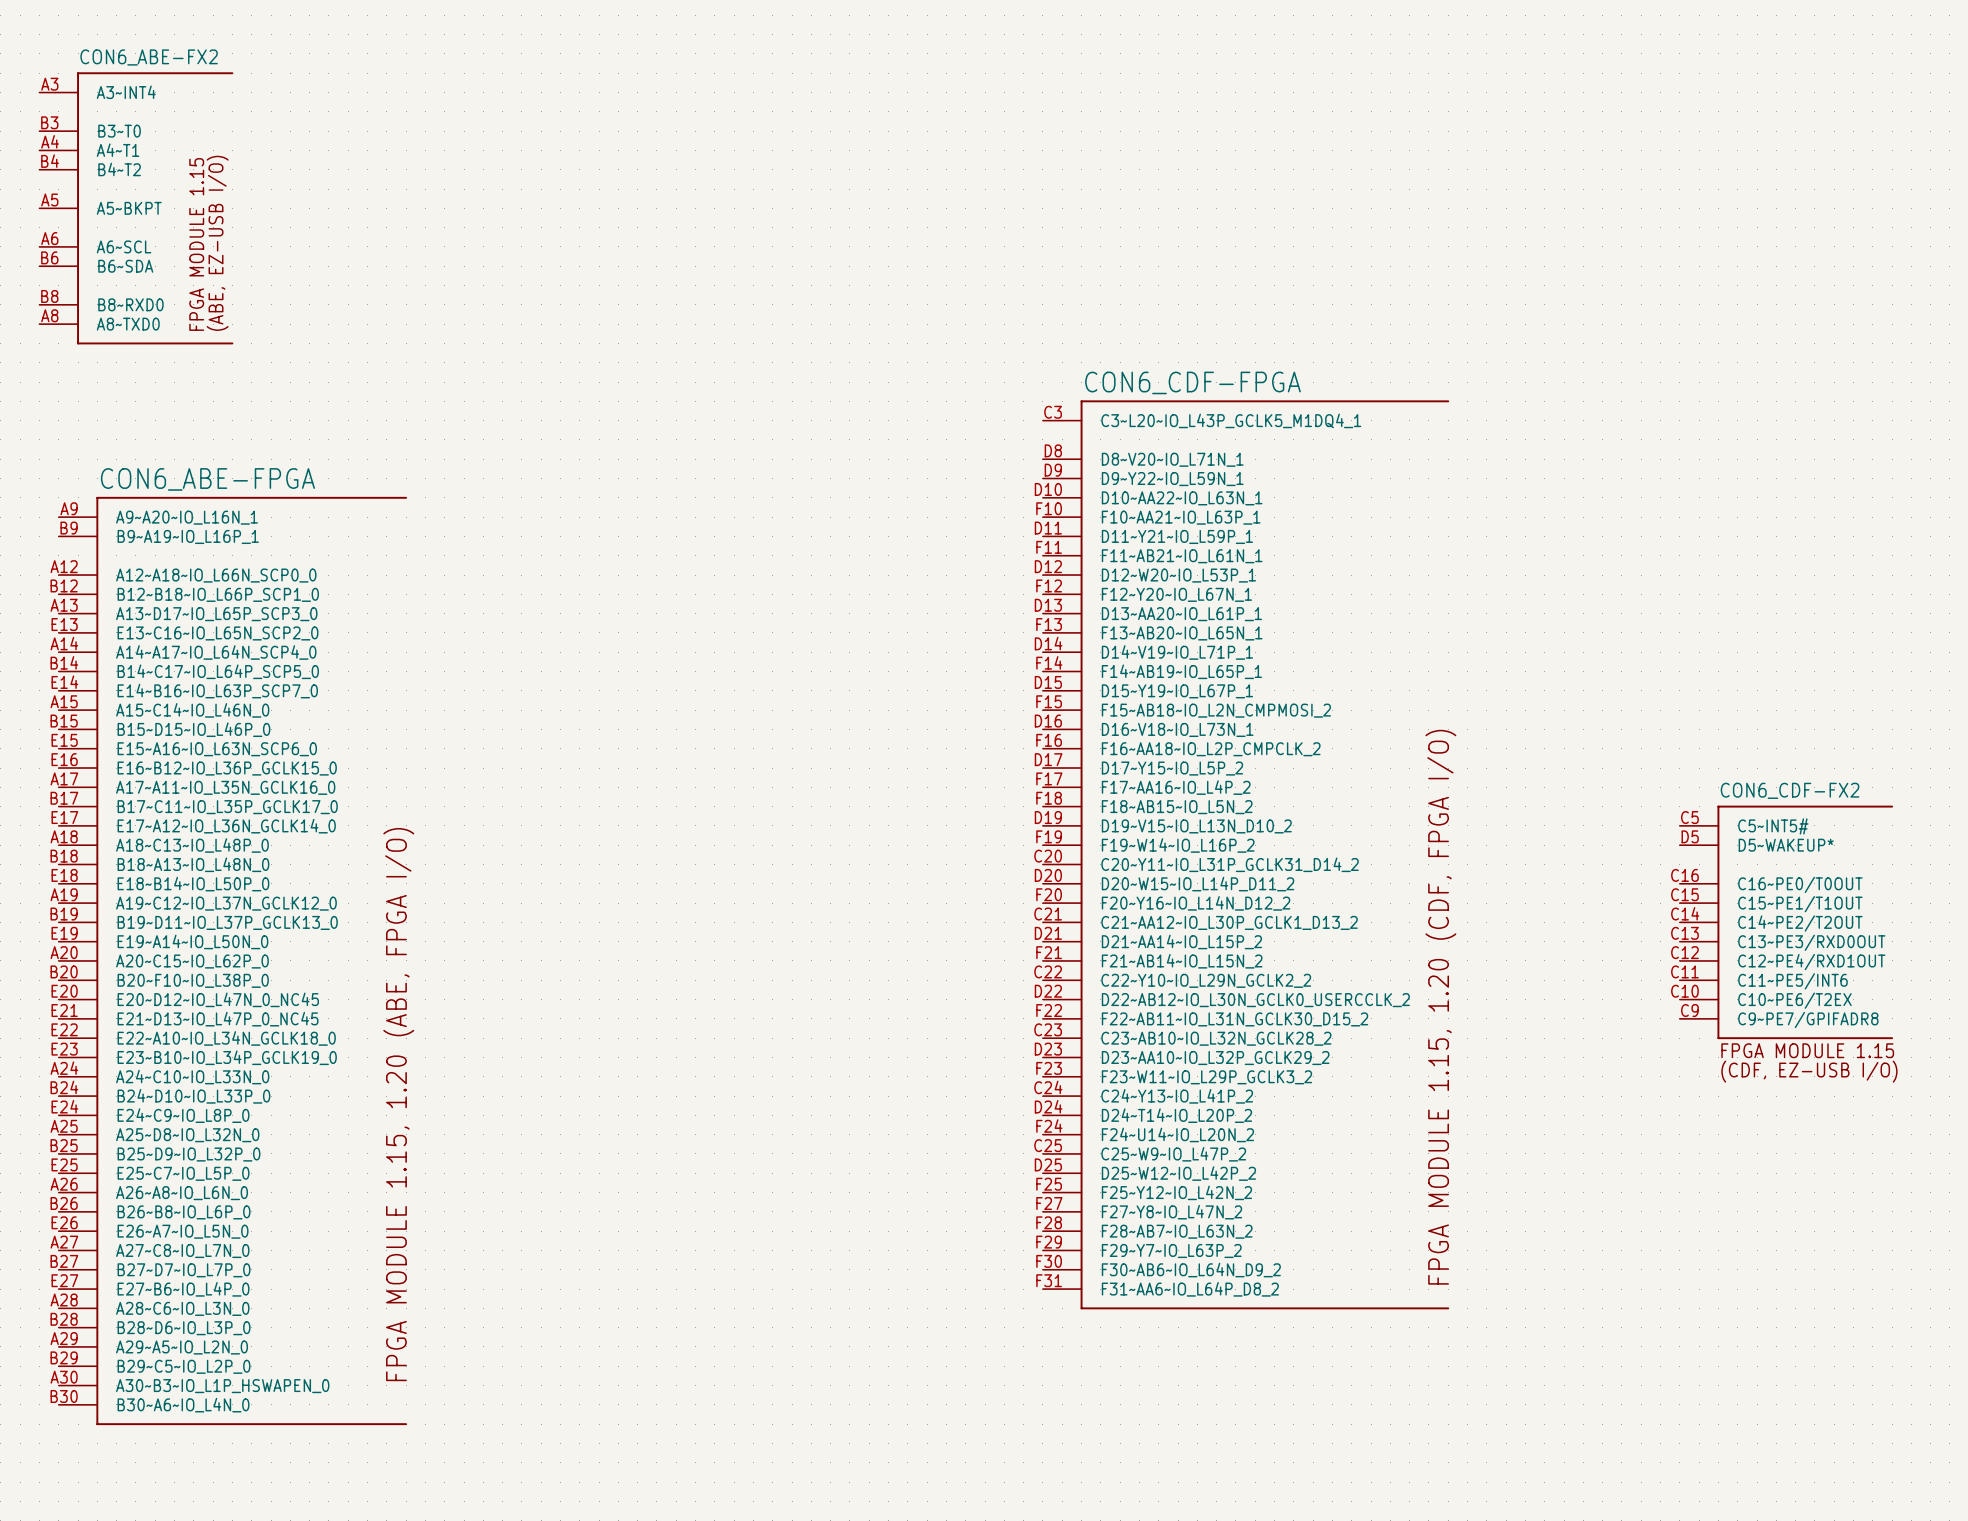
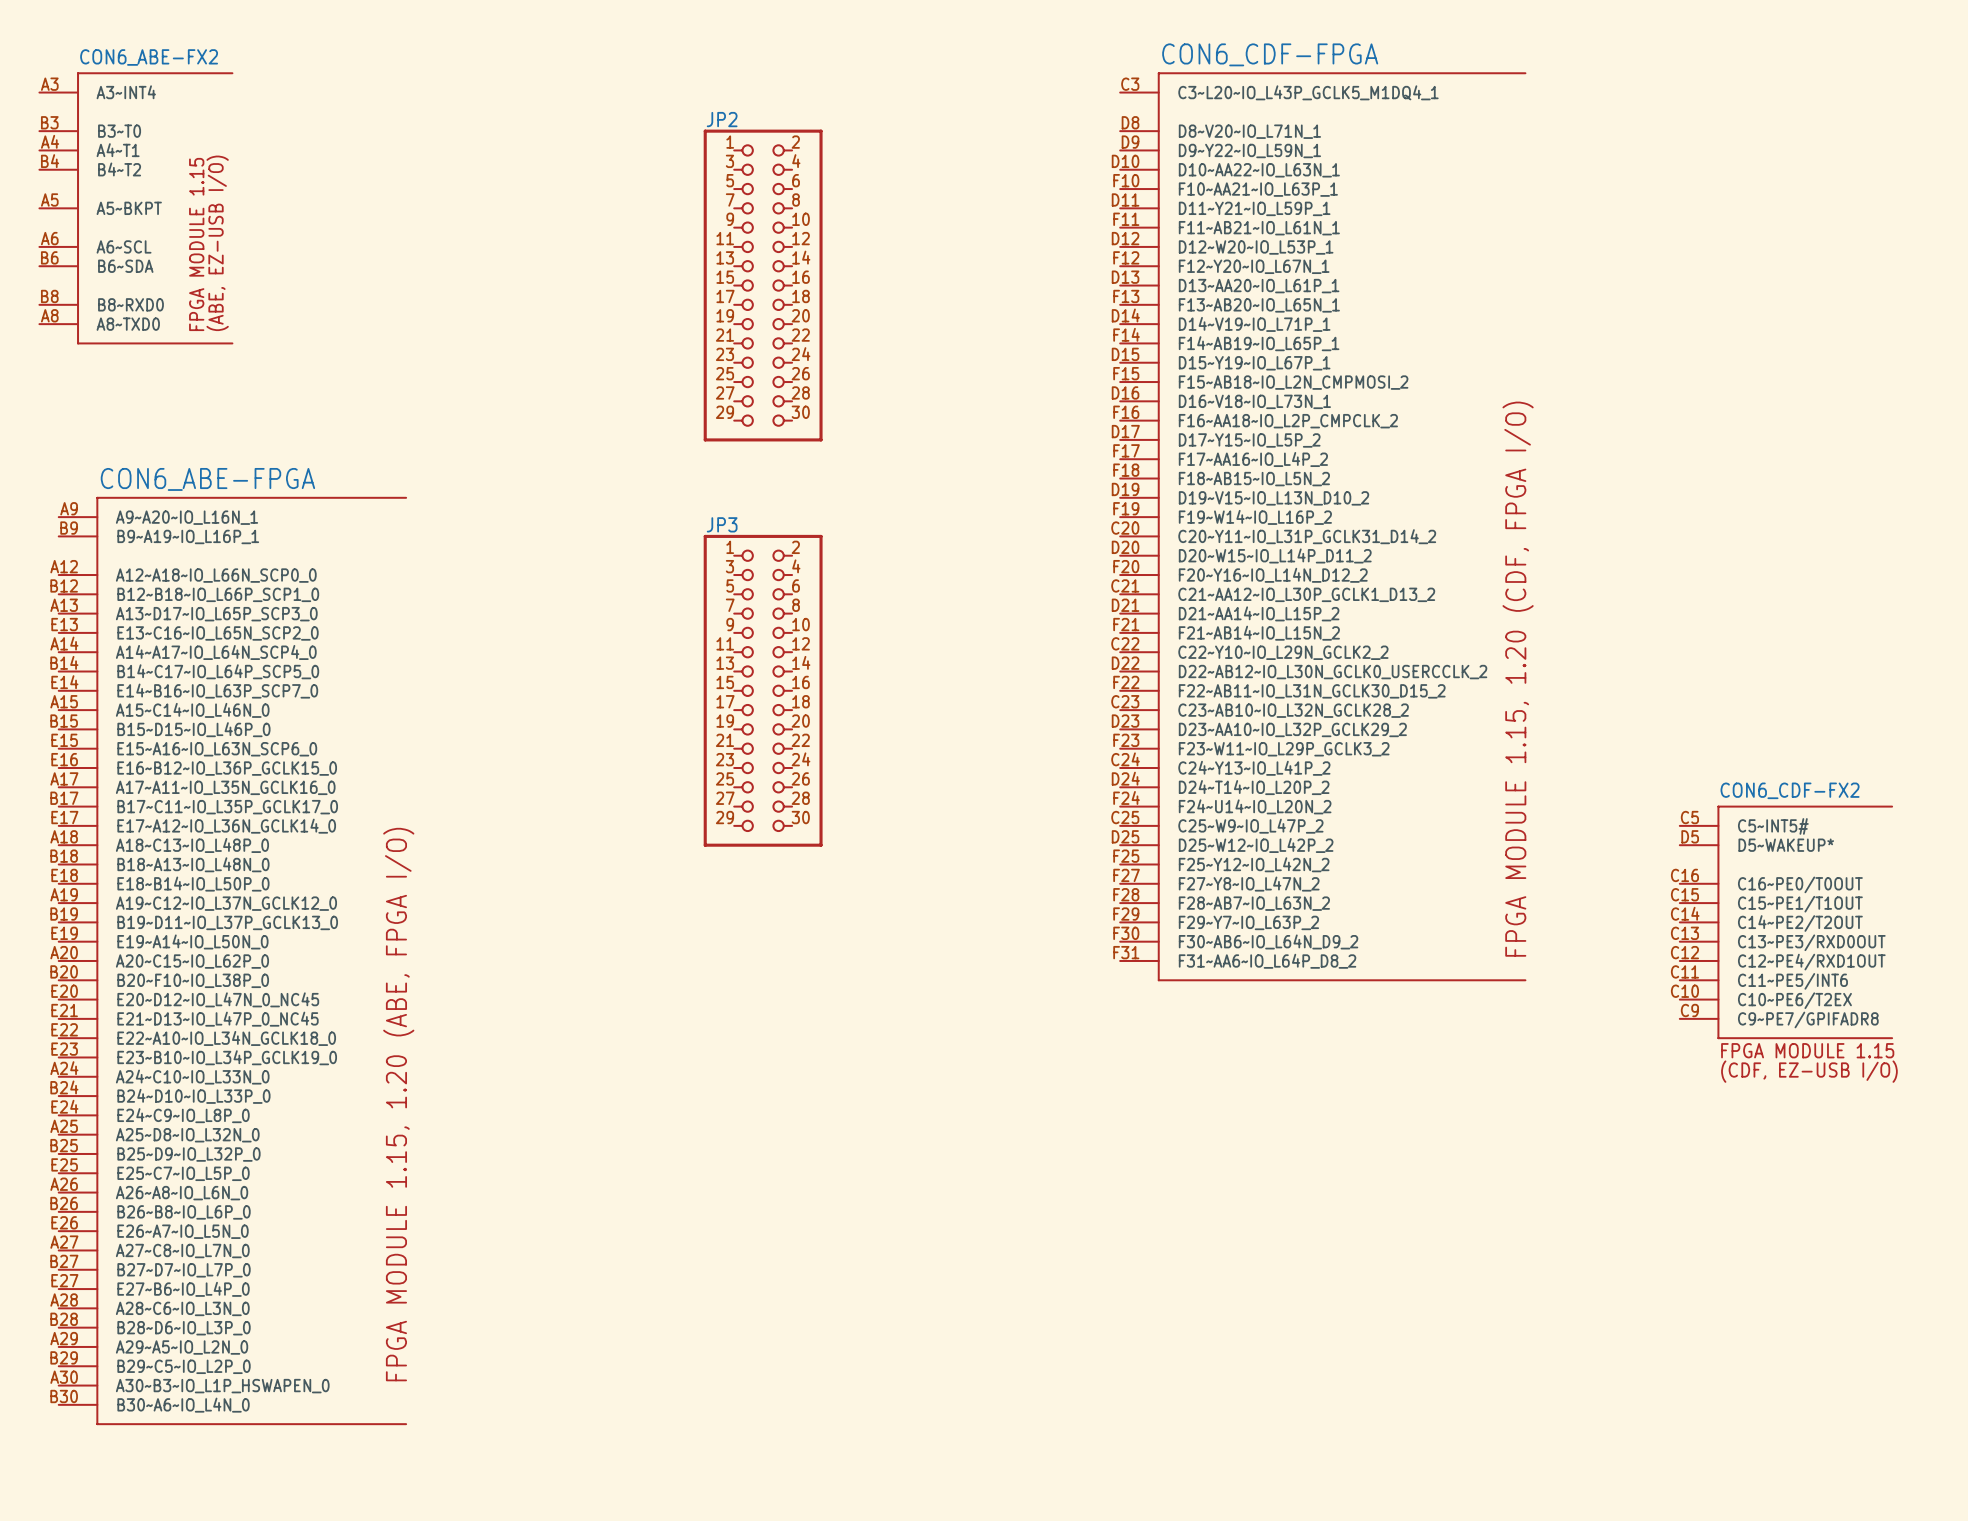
JP2: none -> (763, 285)
JP3: none -> (763, 690)
CON6_CDF-FPGA position: (1246, 854) -> (1323, 526)

